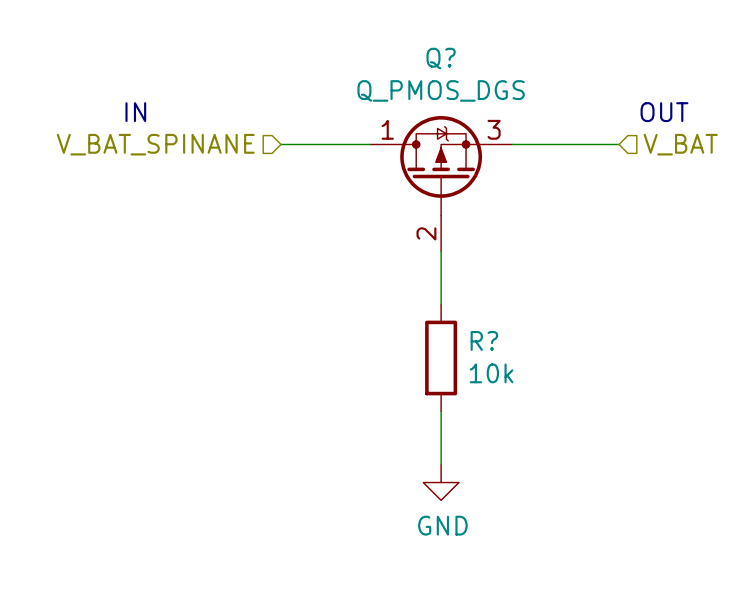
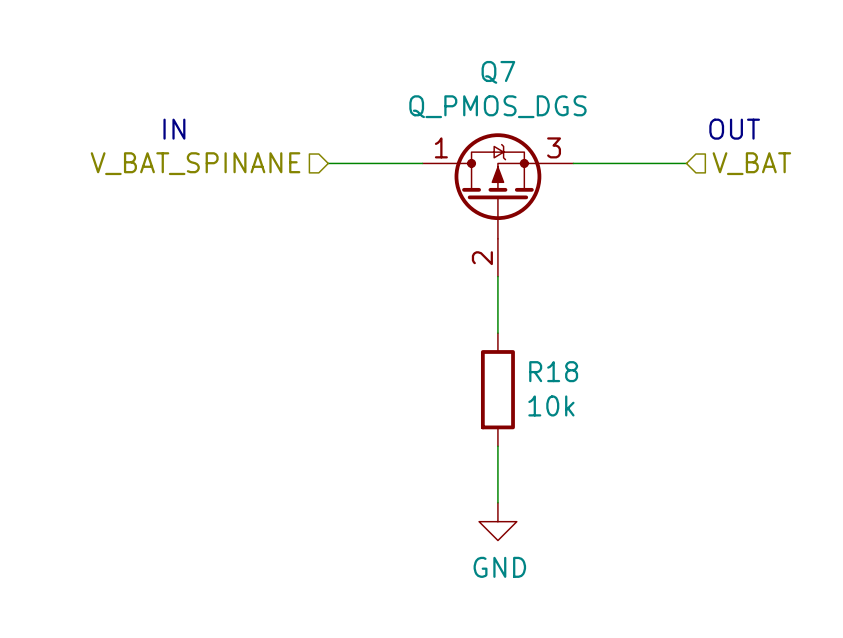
Q? name: Q? (441, 58) -> Q7 (498, 72)
R? name: R? (484, 340) -> R18 (553, 371)

